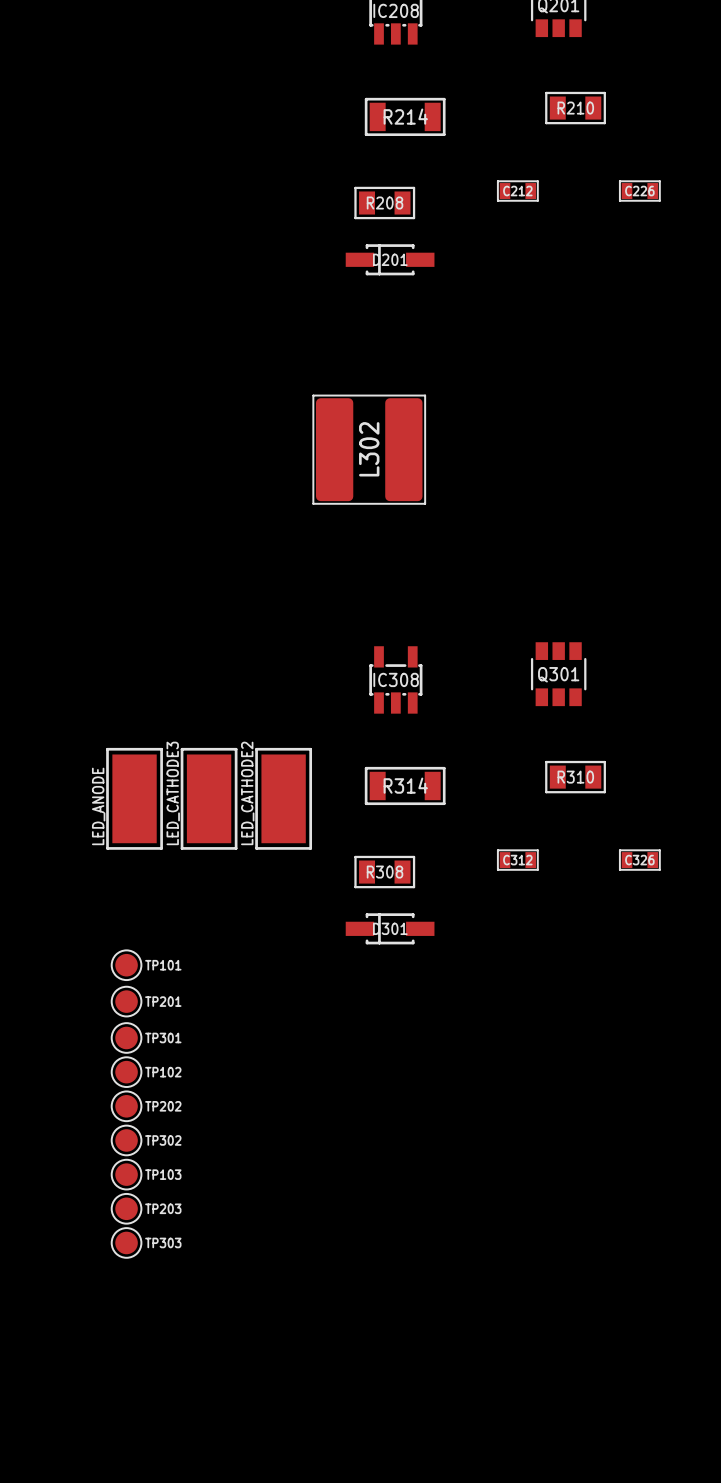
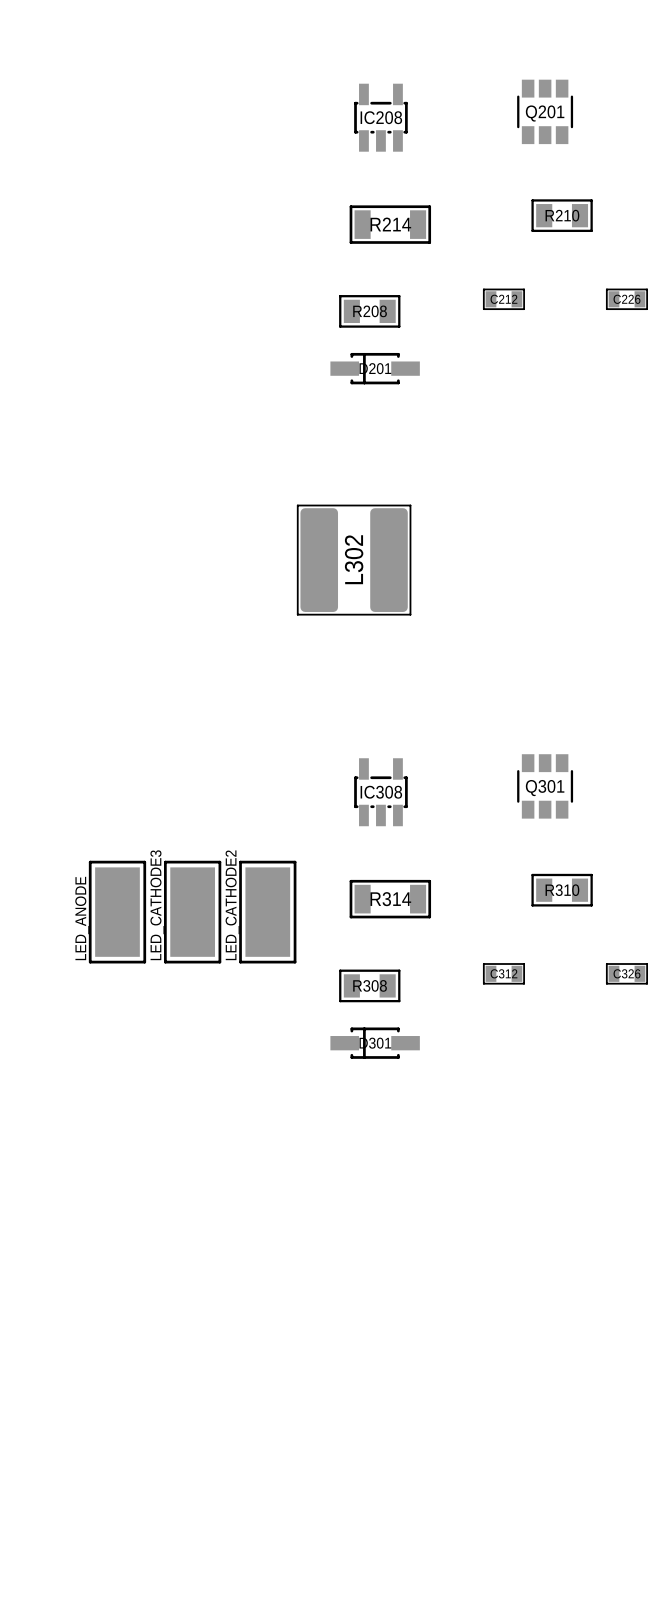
TP101: (126, 965) -> none
TP201: (126, 1001) -> none
TP301: (126, 1037) -> none
TP102: (126, 1072) -> none
TP202: (126, 1106) -> none
TP302: (126, 1140) -> none
TP103: (126, 1174) -> none
TP203: (126, 1208) -> none
TP303: (126, 1242) -> none

